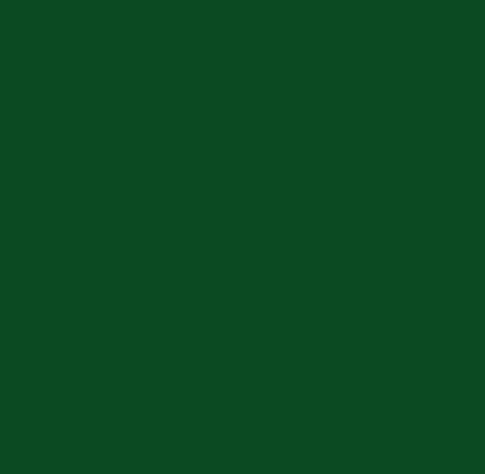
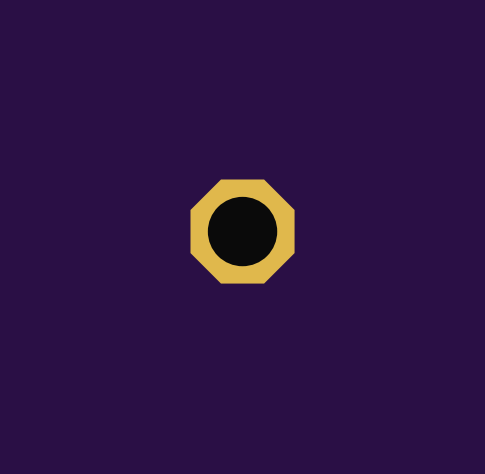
part: none -> (242, 231)

